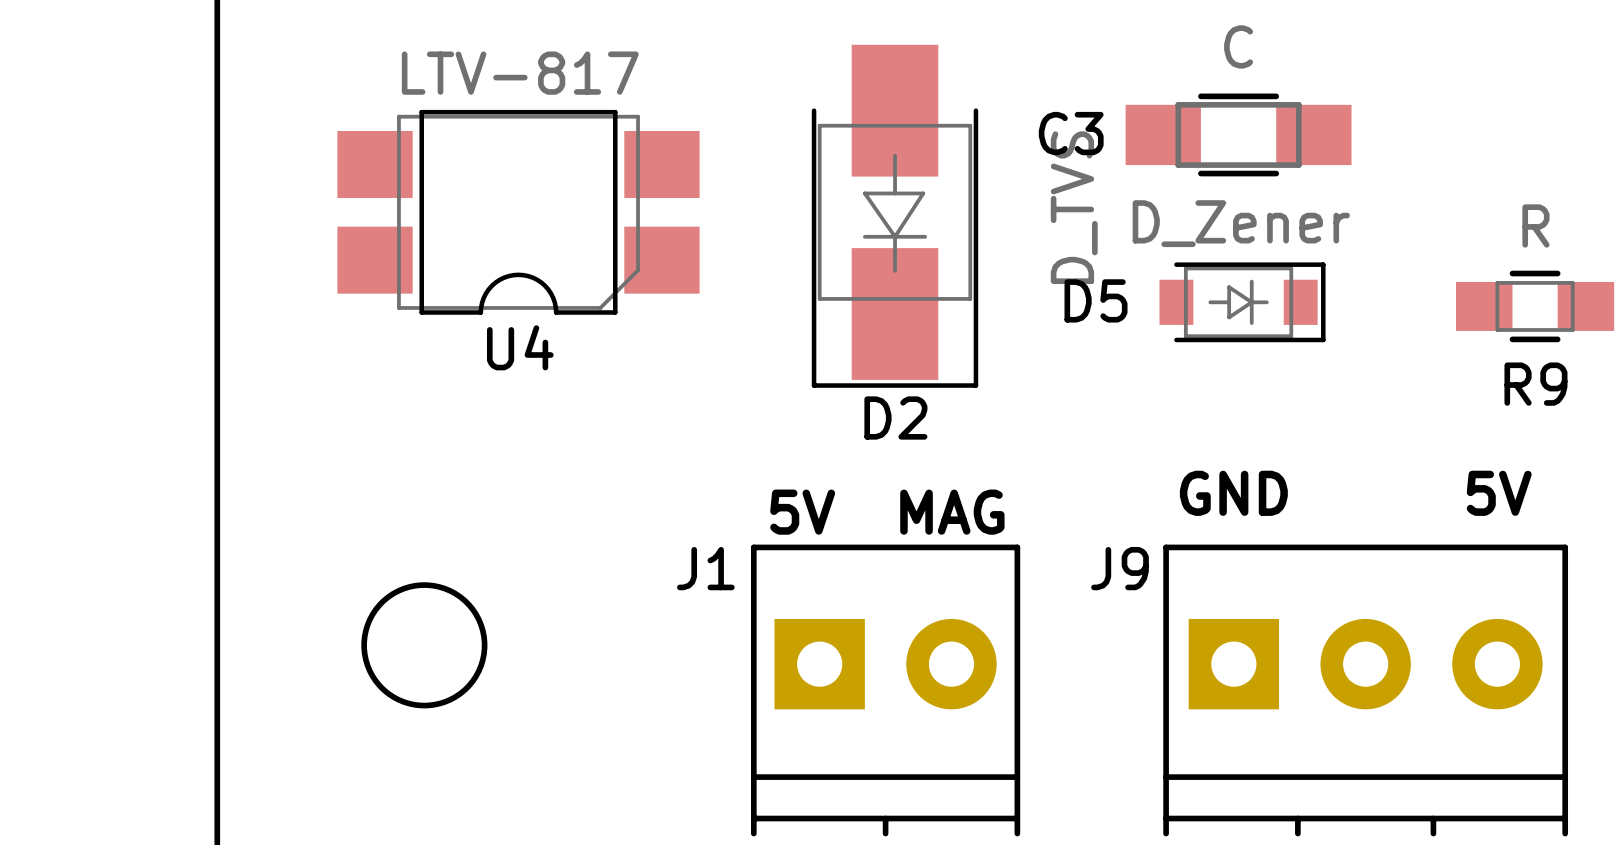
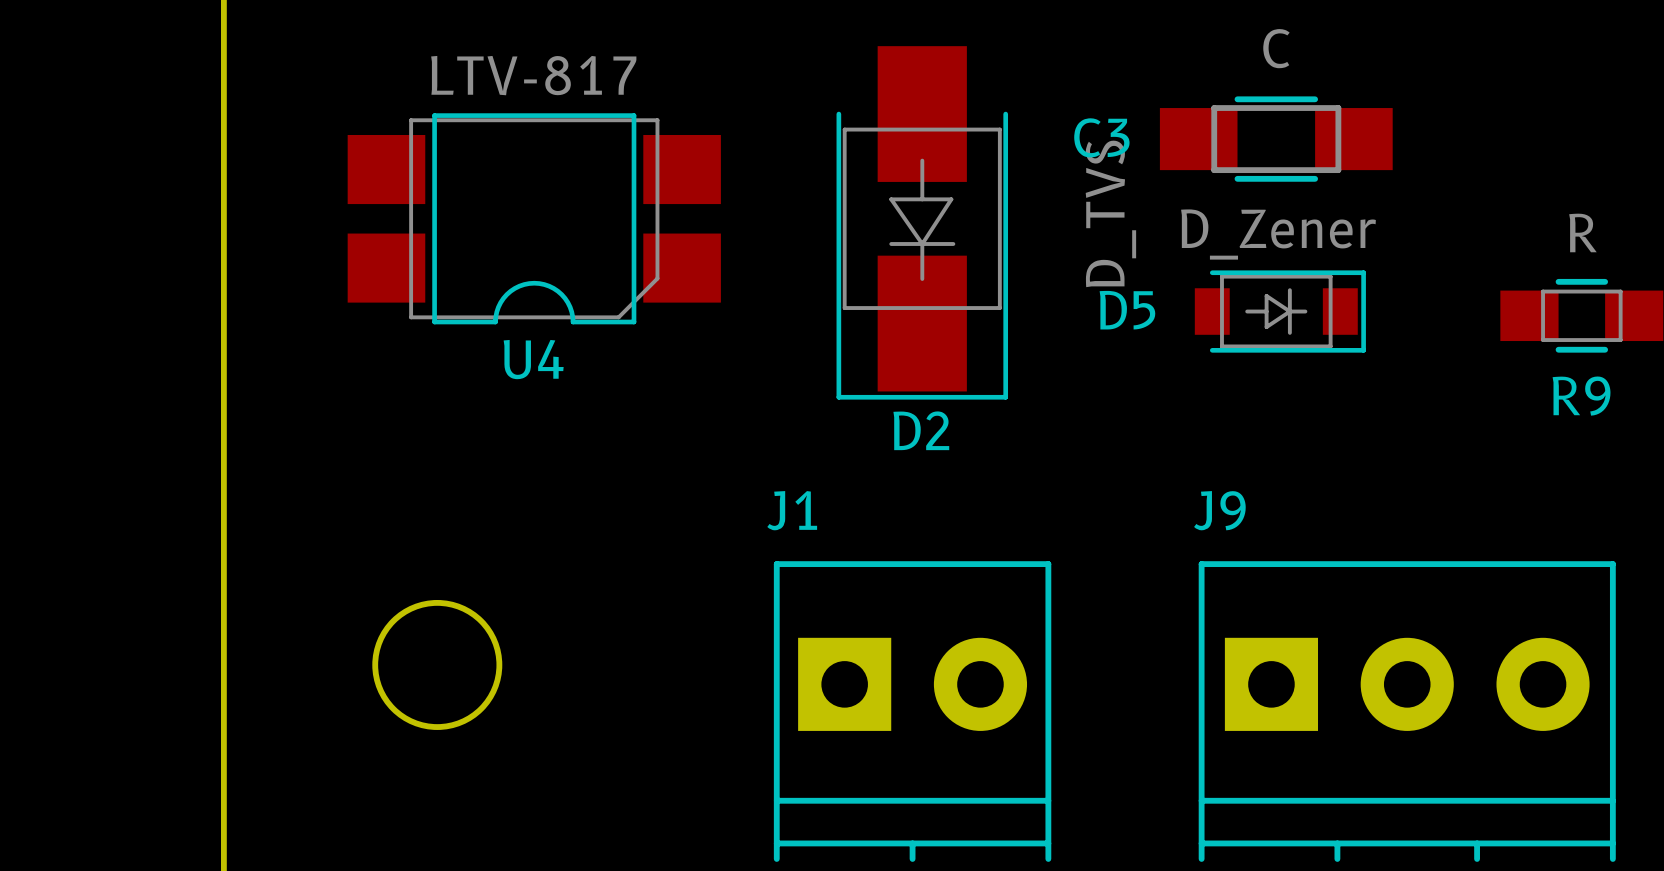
text: GND (1233, 493) -> none
text: 5V (1499, 493) -> none
text: 5V (802, 512) -> none
text: MAG (952, 512) -> none
J1 name position: J1 (705, 568) -> J1 (792, 510)
J9 name position: J9 (1120, 568) -> J9 (1219, 510)

